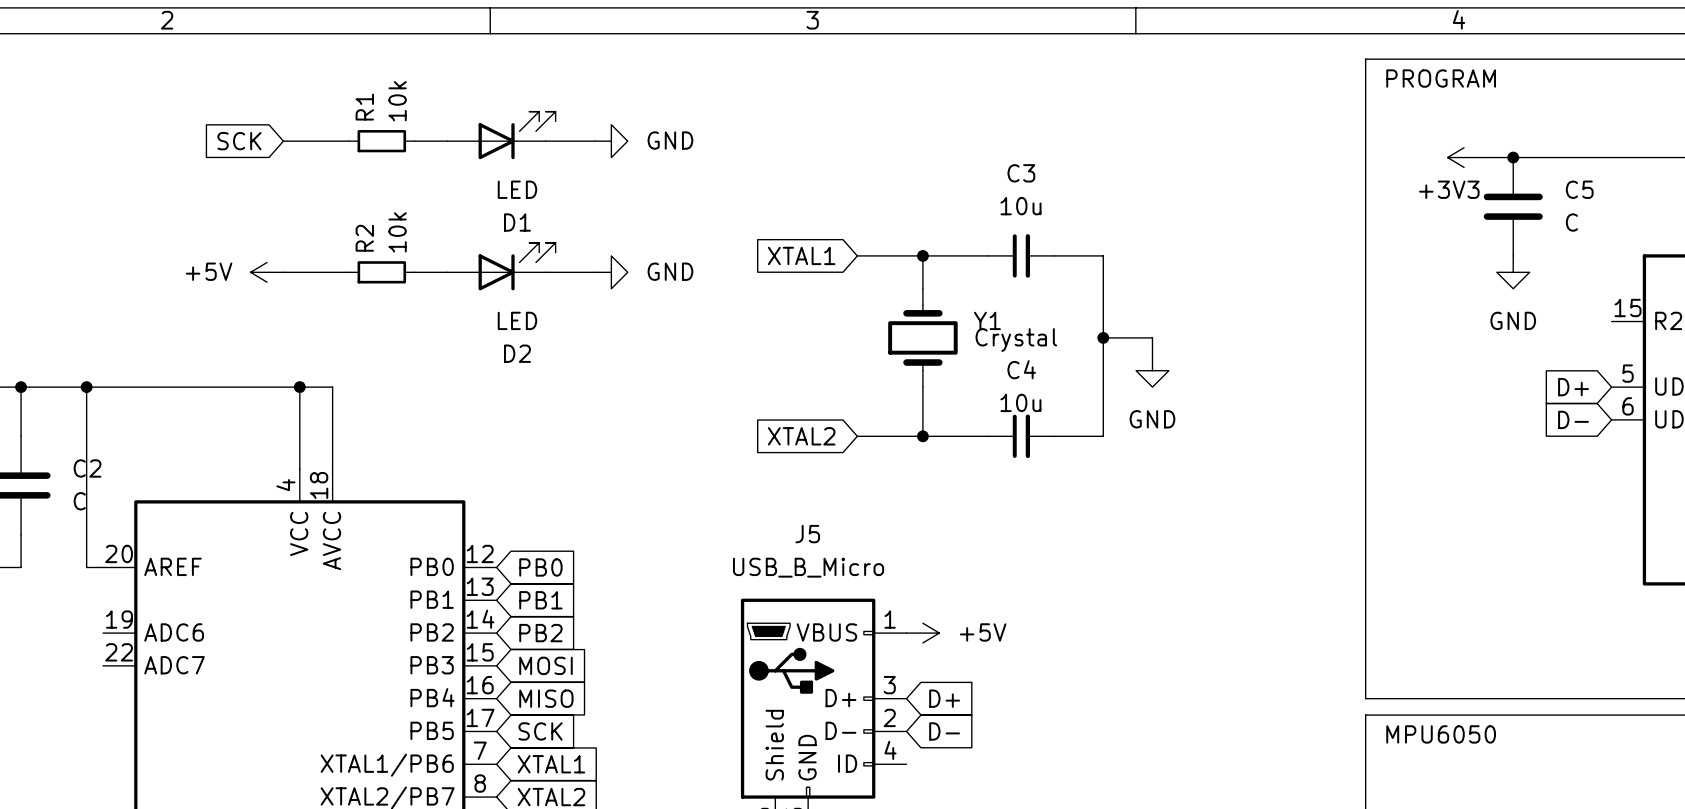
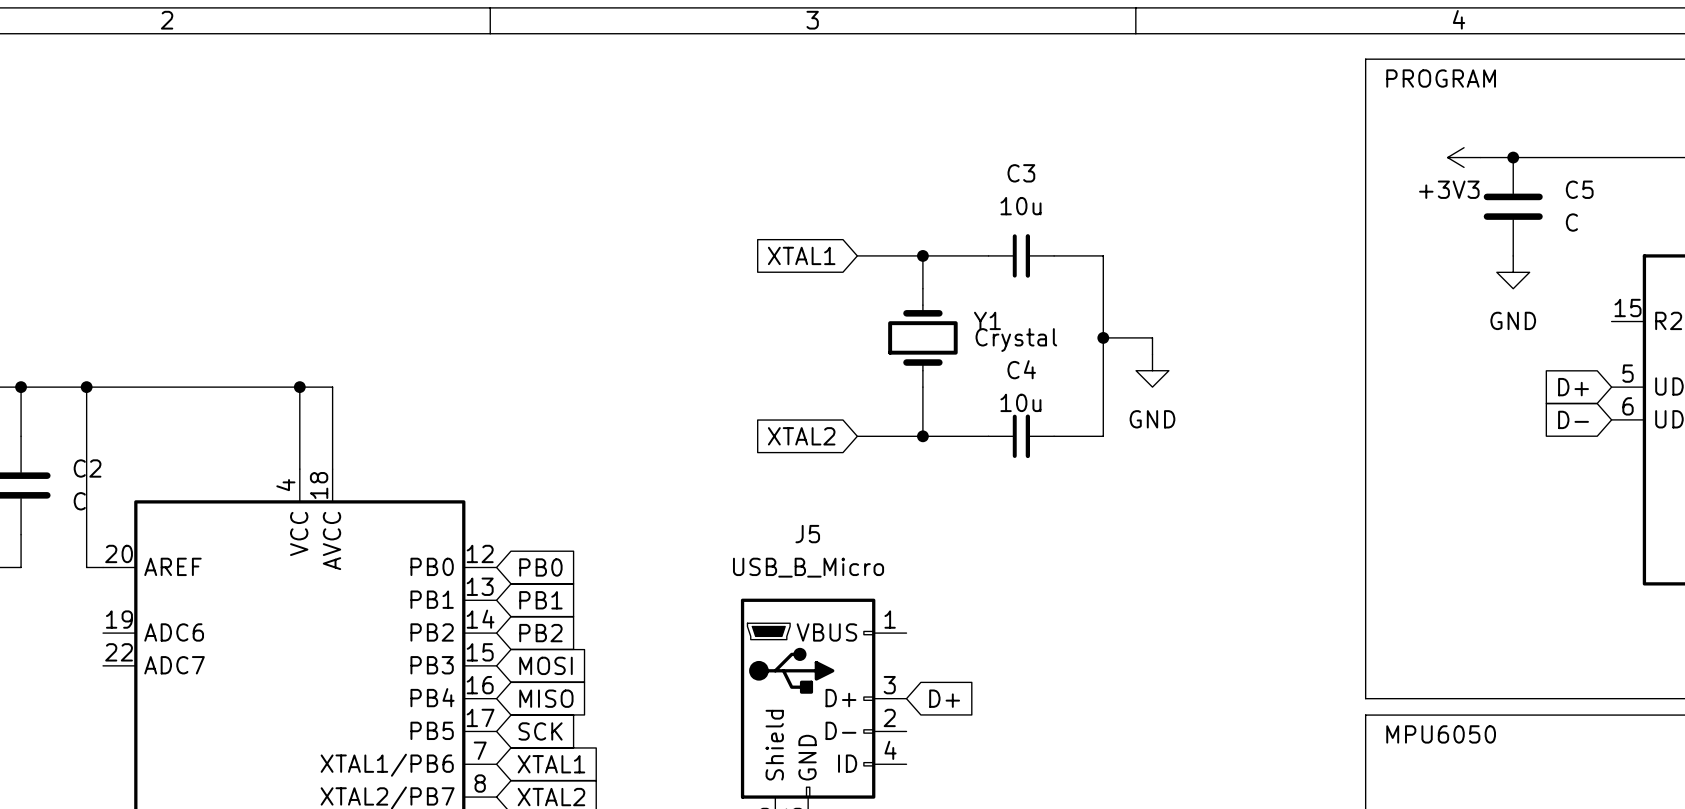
D1: LED (501, 135) -> none
global label: SCK (239, 141) -> none
wire: (283, 141) (349, 141) -> none
R1: 10k (381, 141) -> none
wire: (414, 141) (447, 141) -> none
wire: (545, 141) (594, 141) -> none
power symbol: GND (611, 141) -> none
D2: LED (501, 266) -> none
power symbol: +5V (267, 272) -> none
wire: (283, 272) (349, 272) -> none
R2: 10k (381, 272) -> none
wire: (414, 272) (447, 272) -> none
wire: (545, 272) (594, 272) -> none
power symbol: GND (611, 272) -> none
power symbol: +5V (922, 633) -> none
global label: D- (944, 731) -> none

